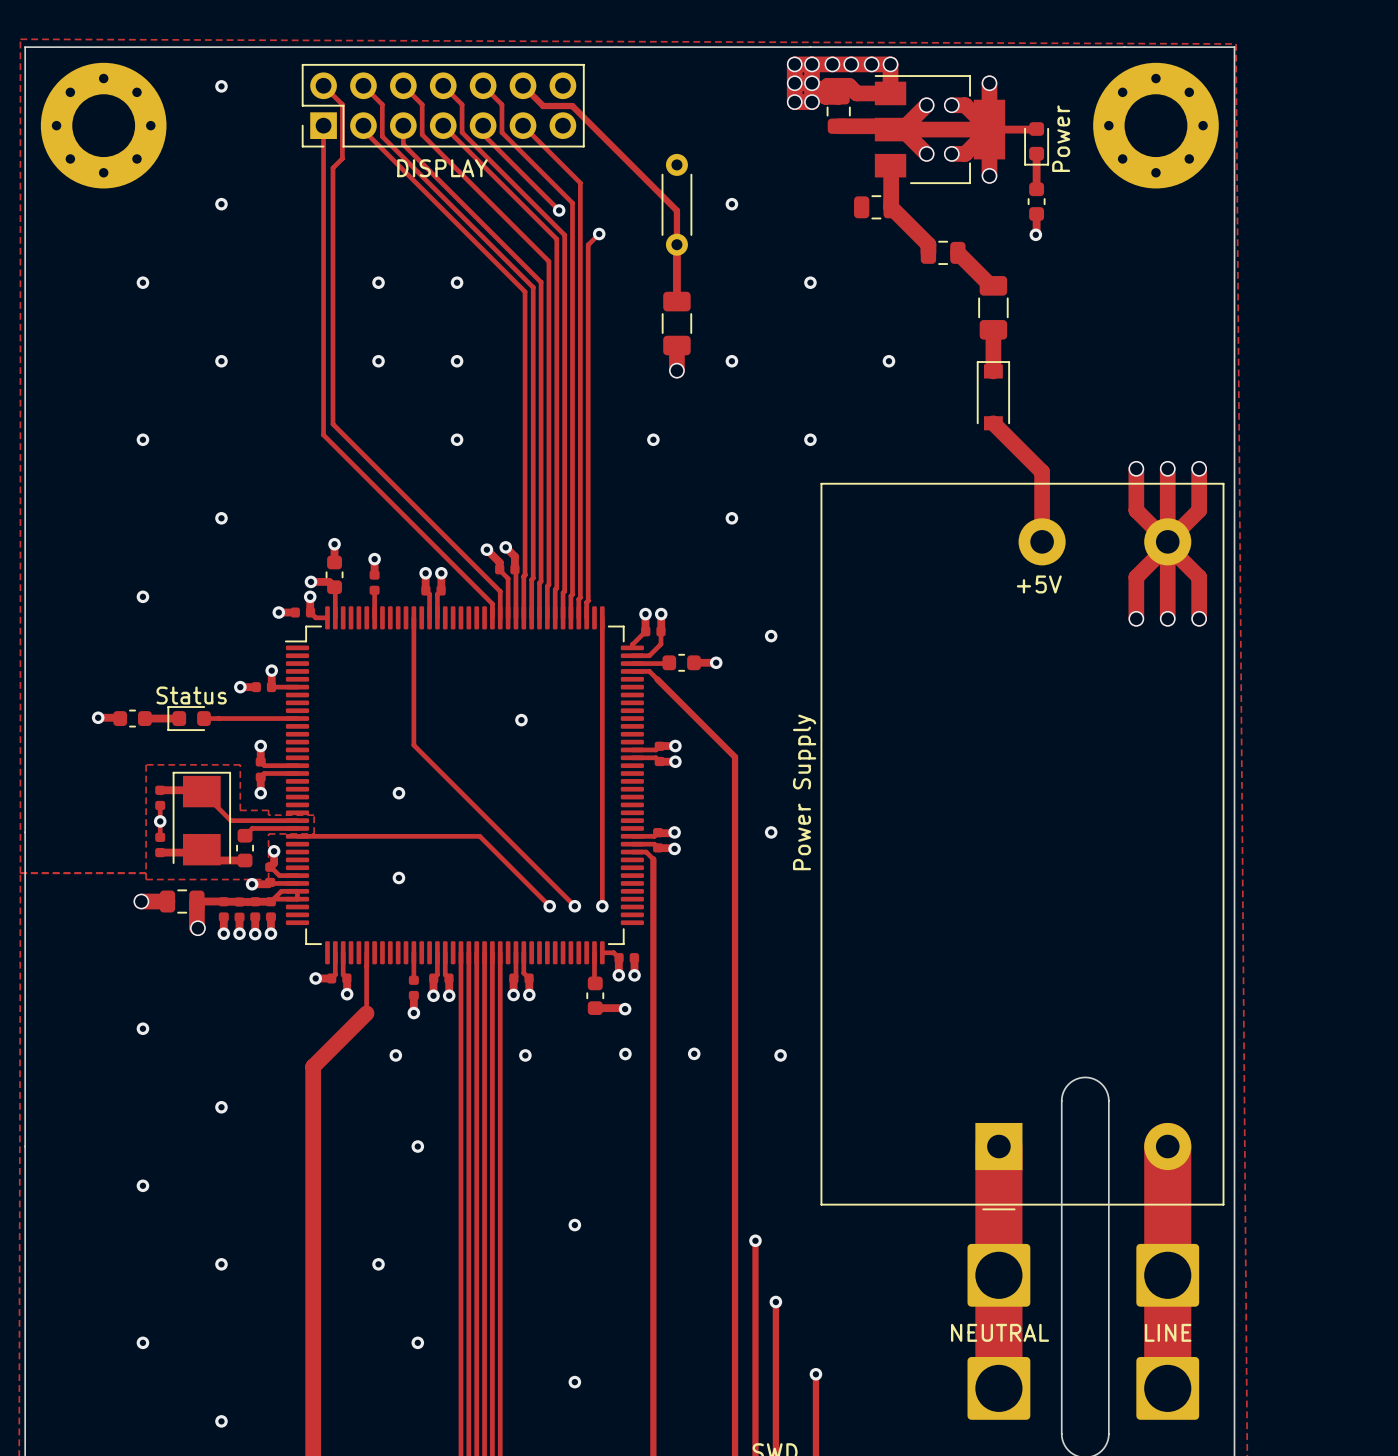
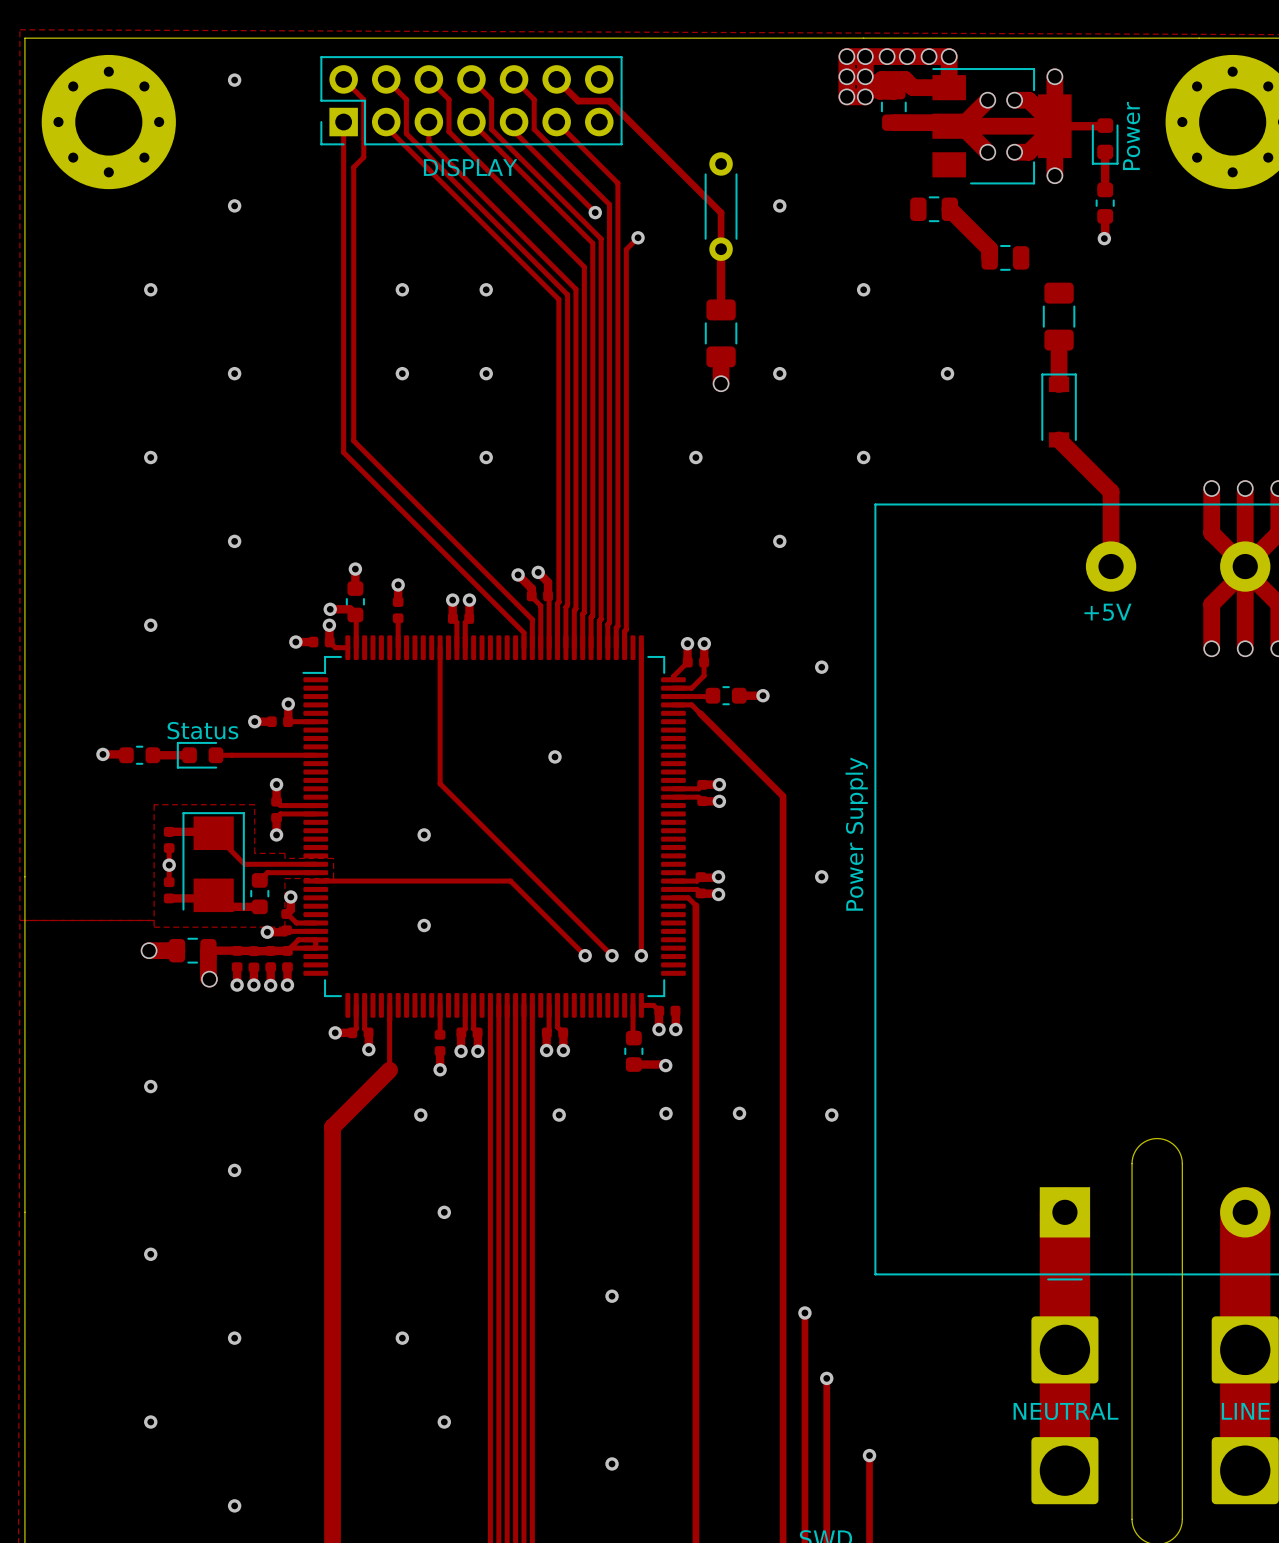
track: (891, 166) (891, 207) -> none
track: (957, 252) (990, 285) (993, 285) -> none

